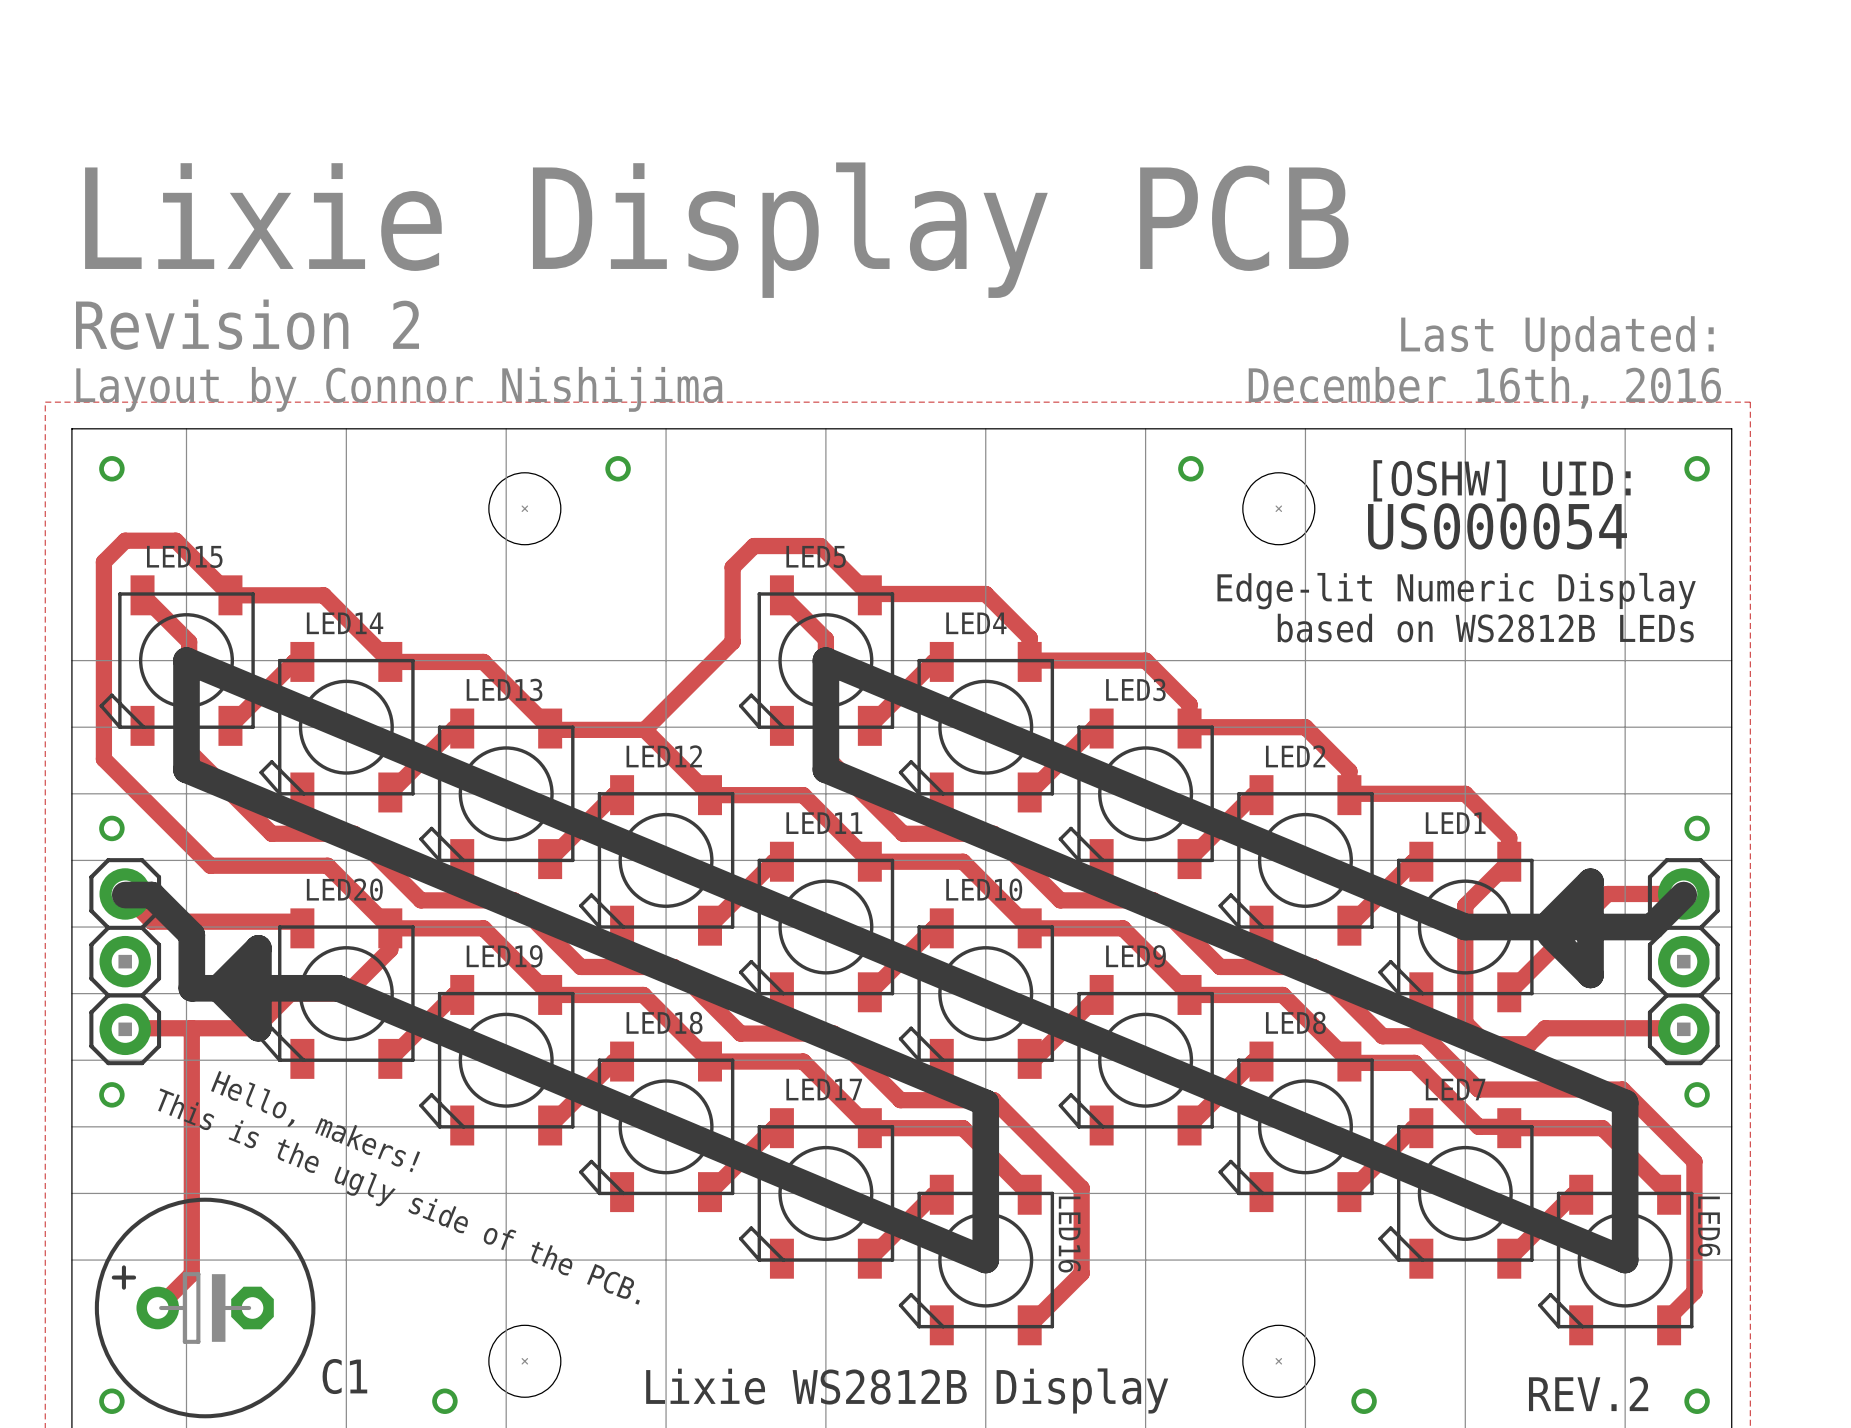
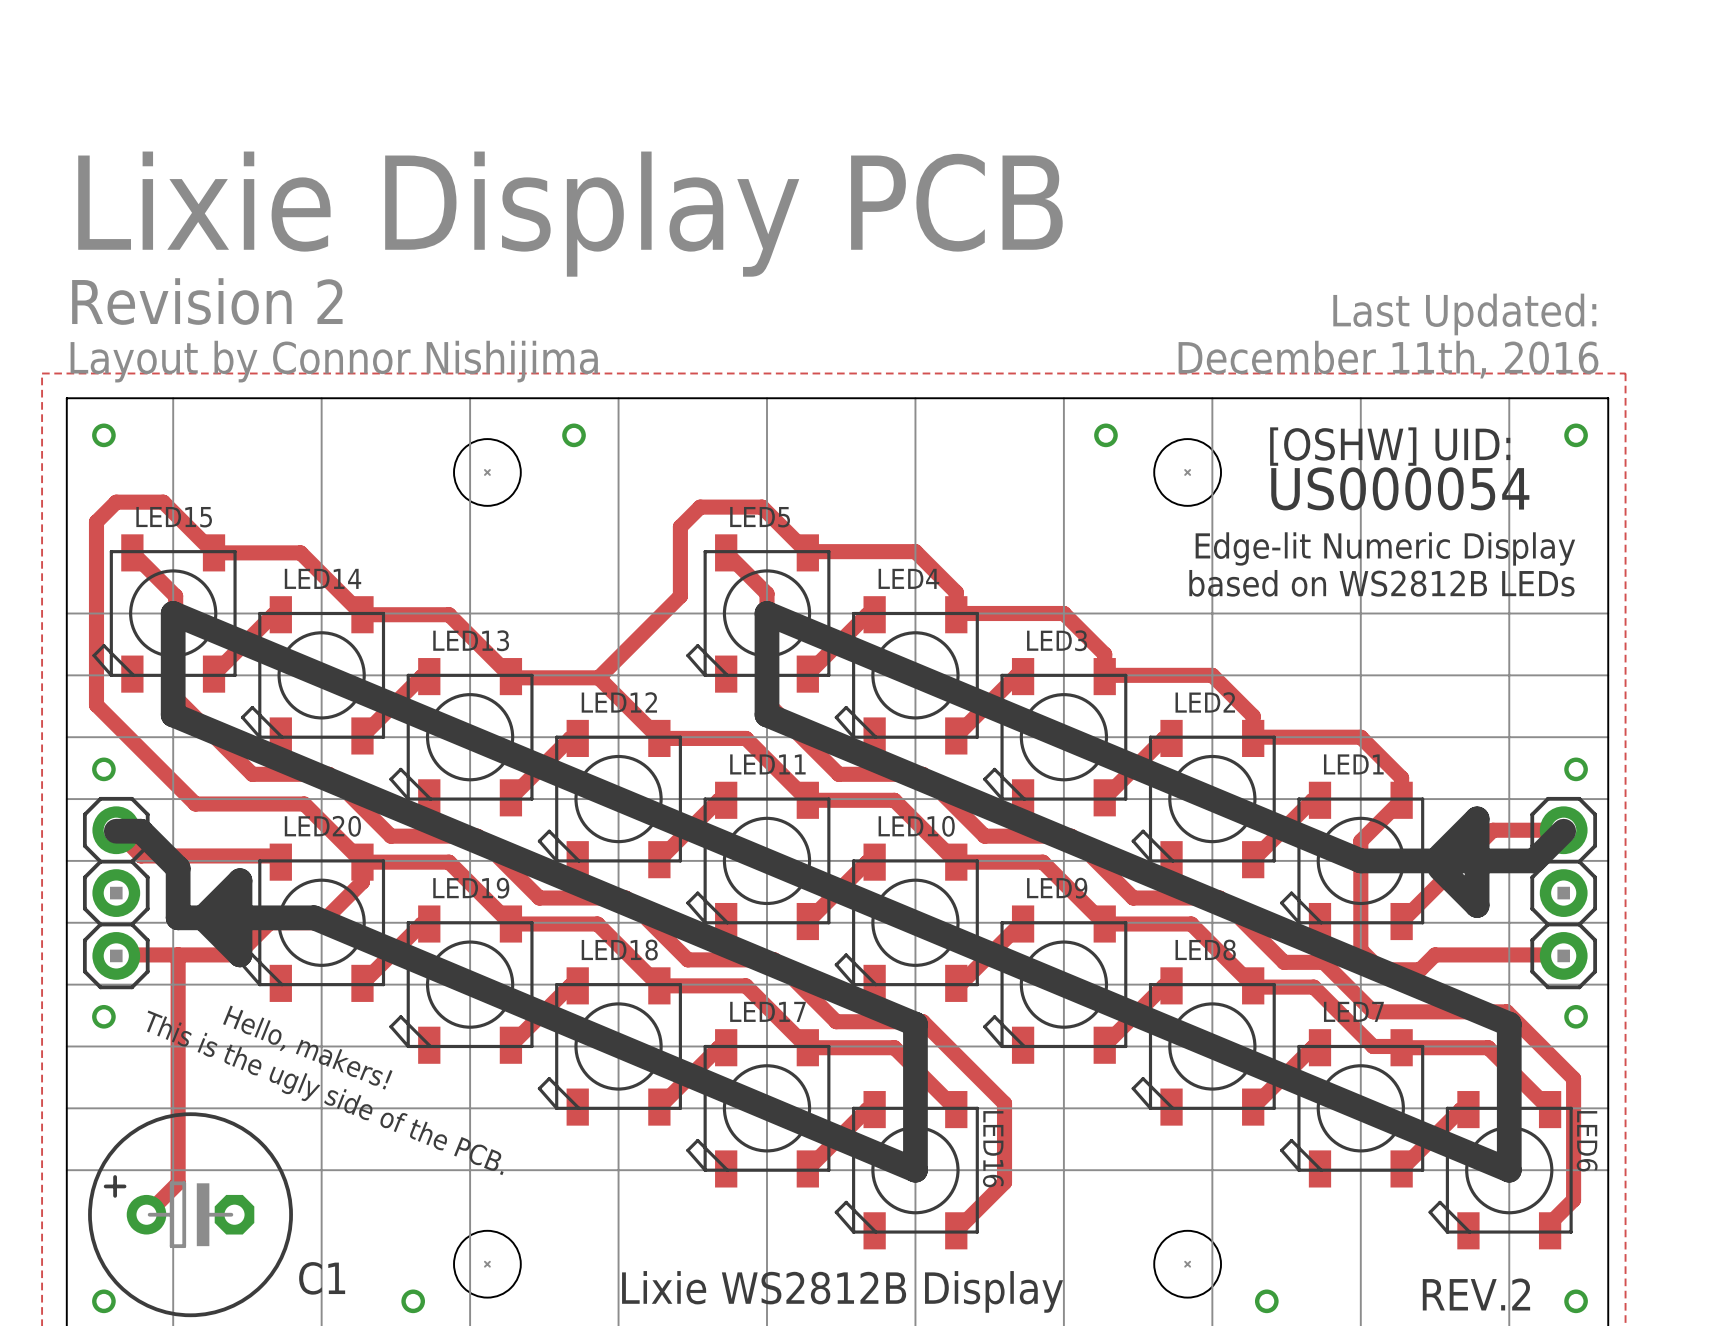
text: December 16th, 2016 (1484, 387) -> December 11th, 2016 (1388, 359)

